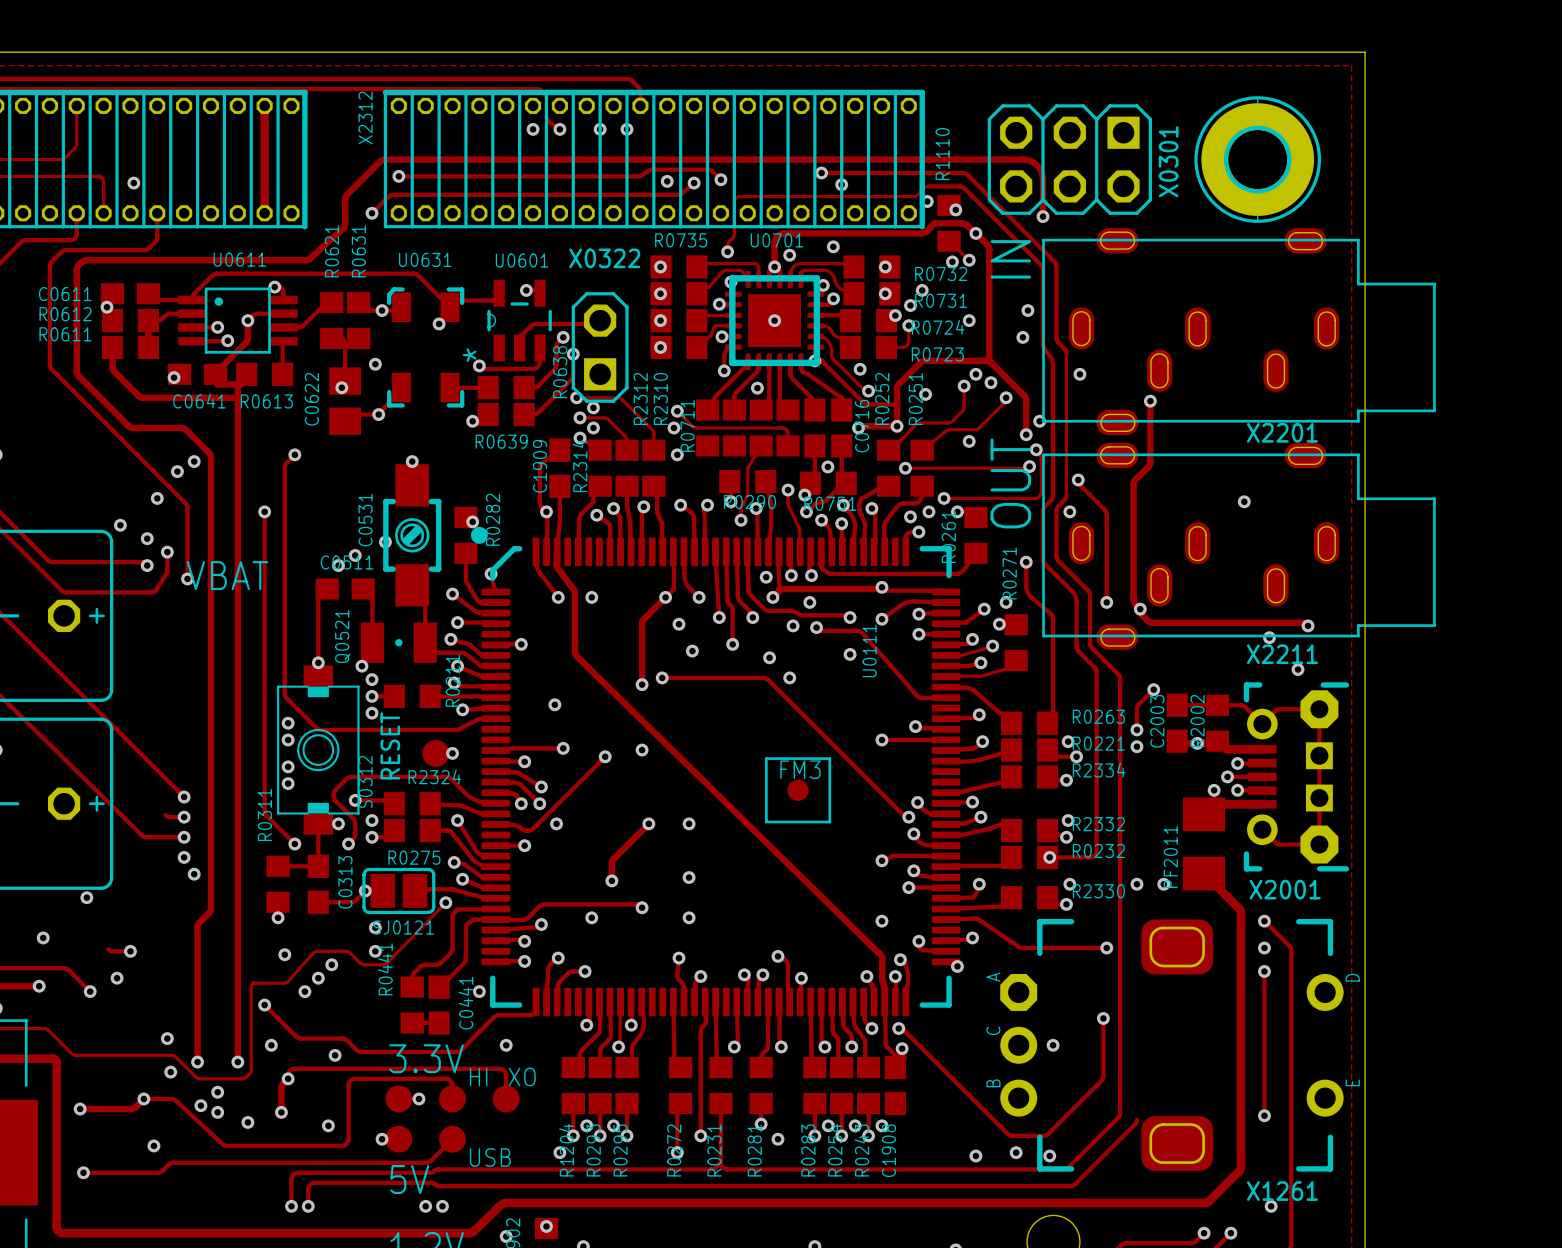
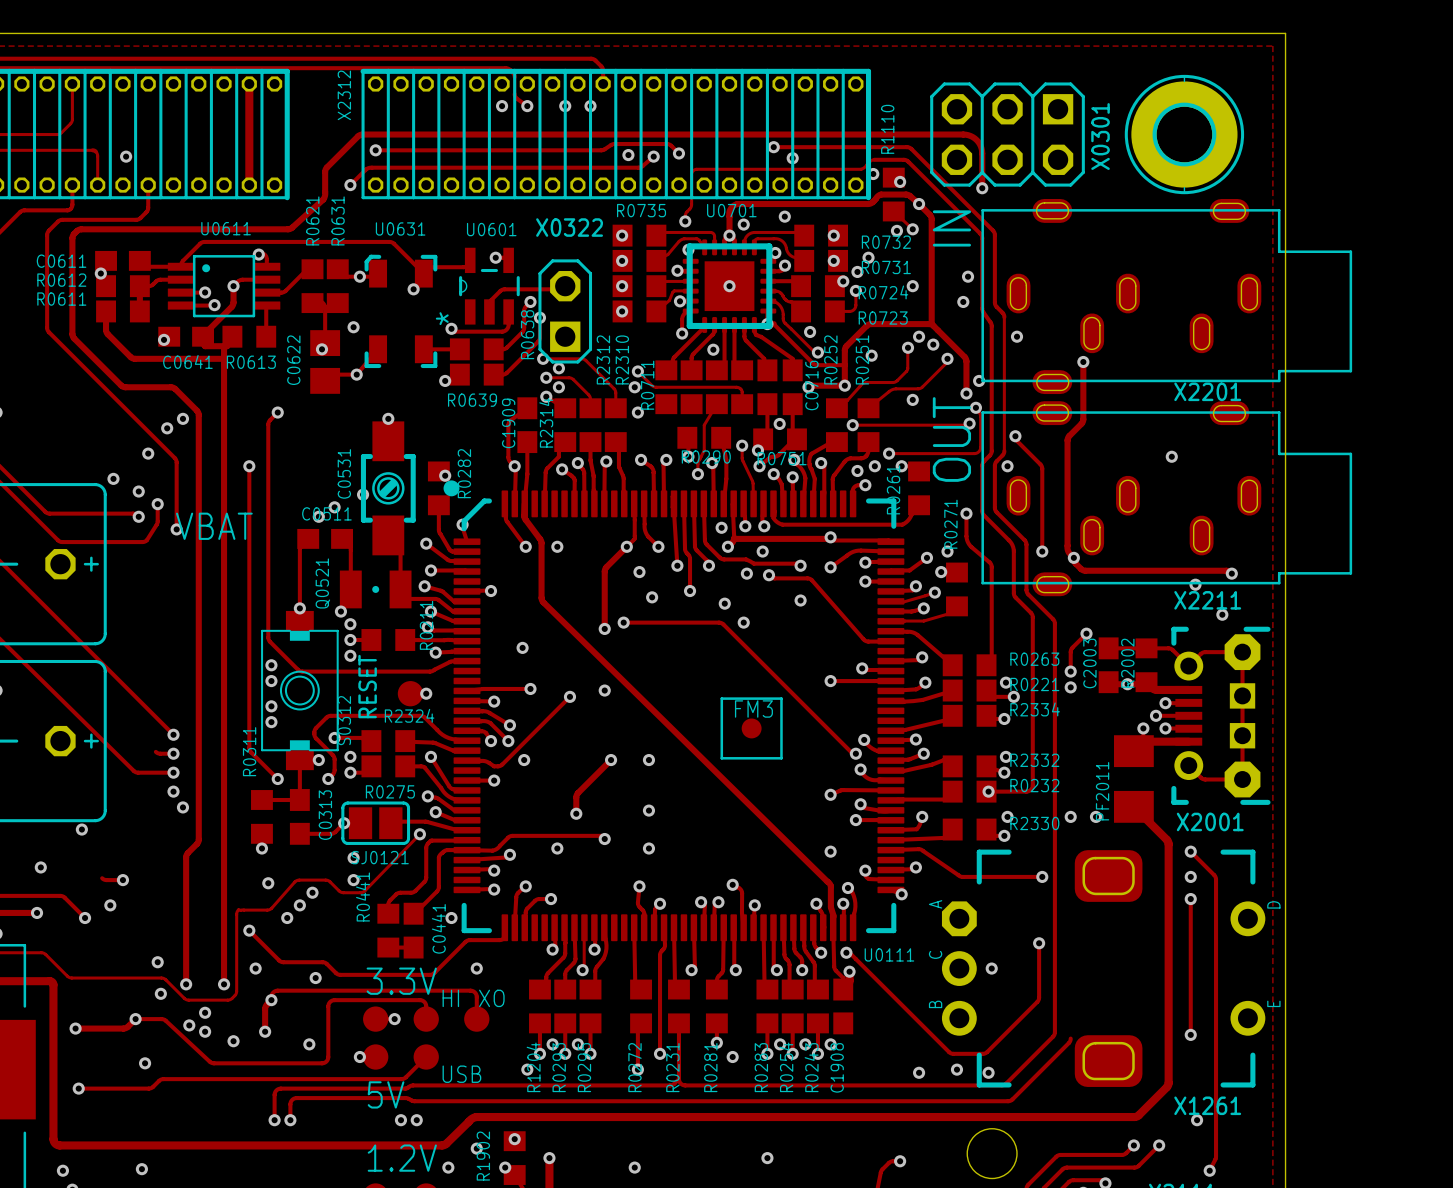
U0111 name rotation: 0° (869, 650) -> 90° clockwise (889, 954)
U0111 name position: U0111 (869, 650) -> U0111 (889, 954)

